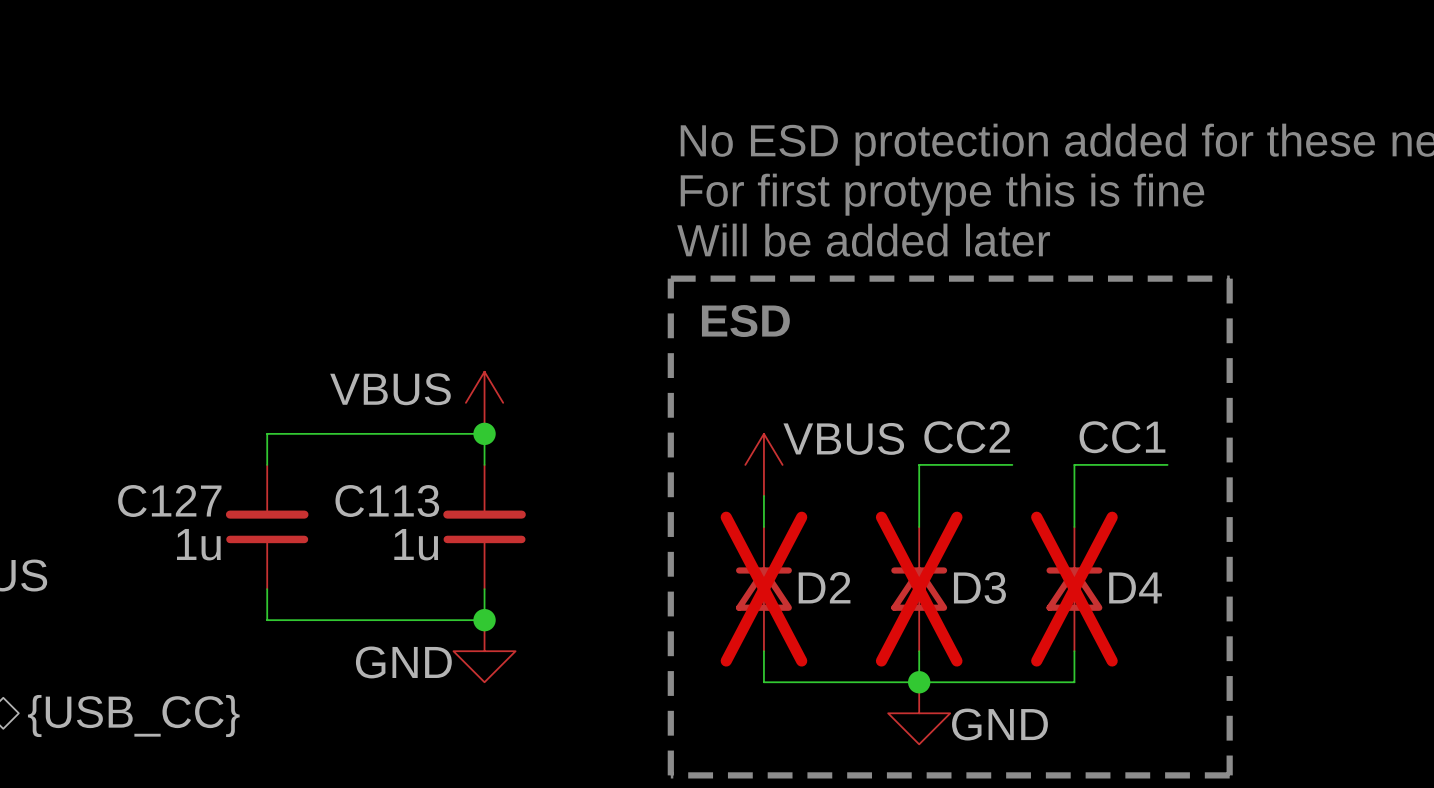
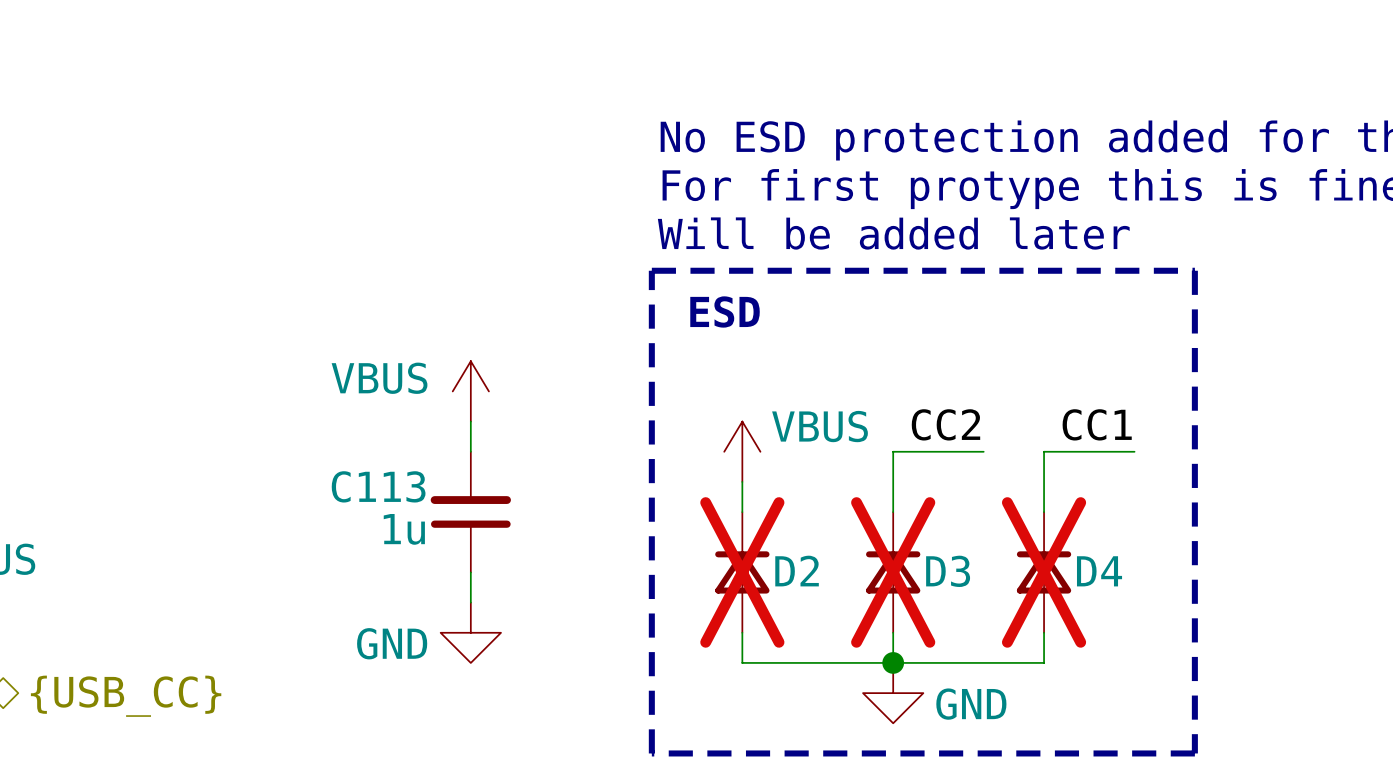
wire: (484, 433) (267, 433) (267, 464) -> none
junction: (484, 433) -> none
C127: 1u (267, 527) -> none
wire: (267, 589) (267, 620) (484, 620) -> none
junction: (484, 620) -> none

